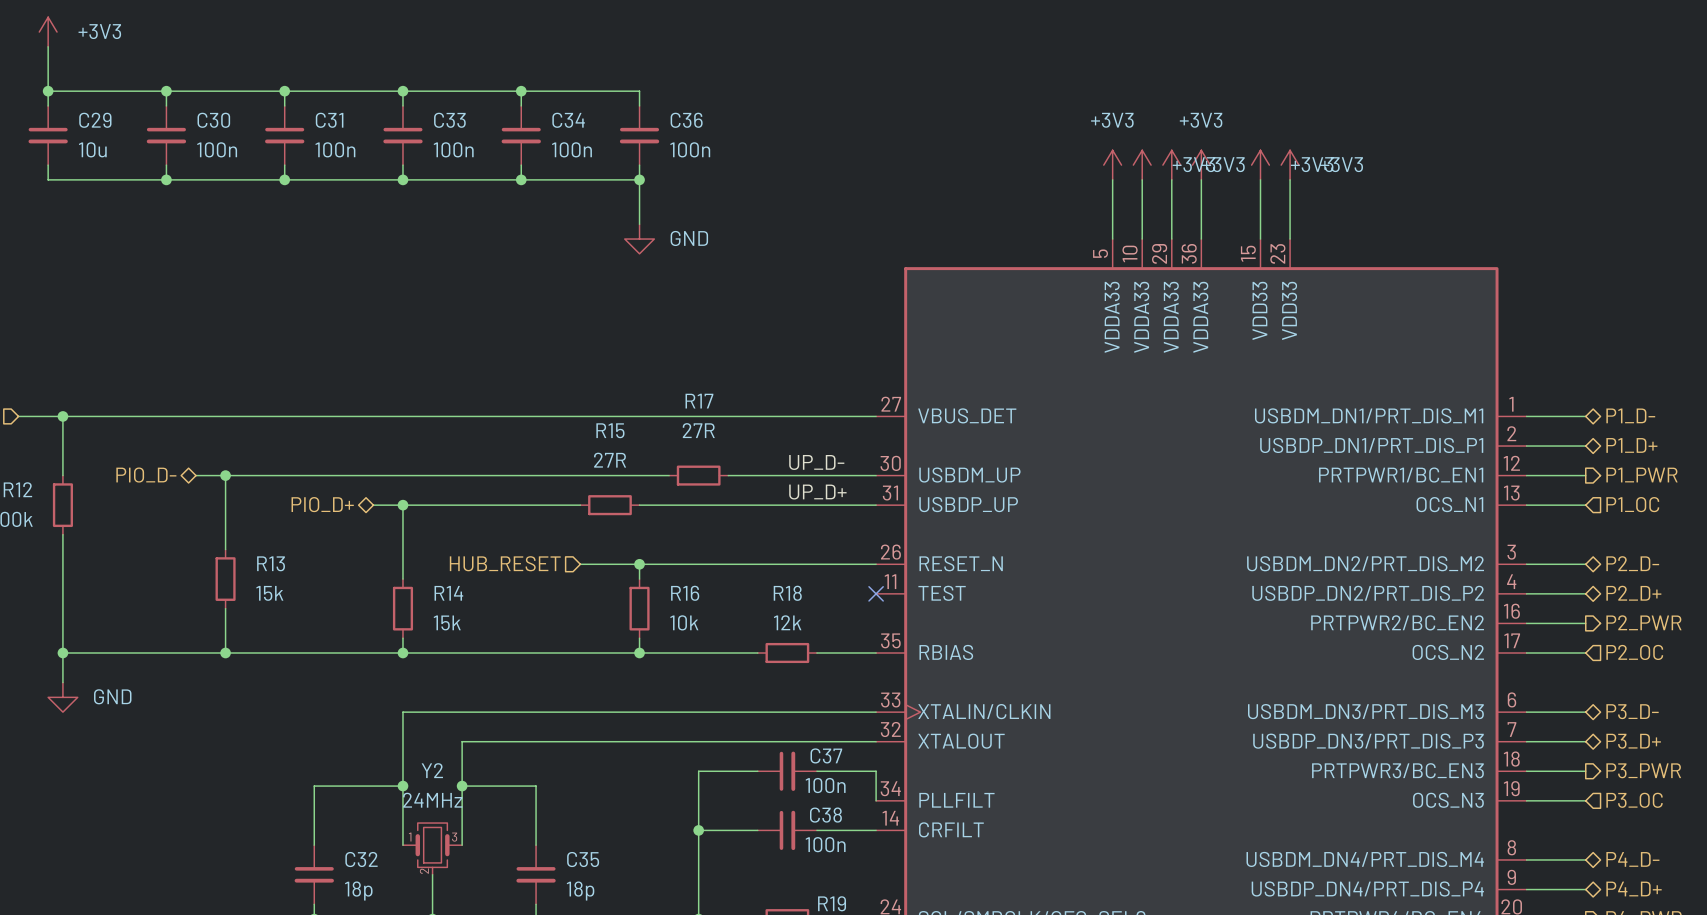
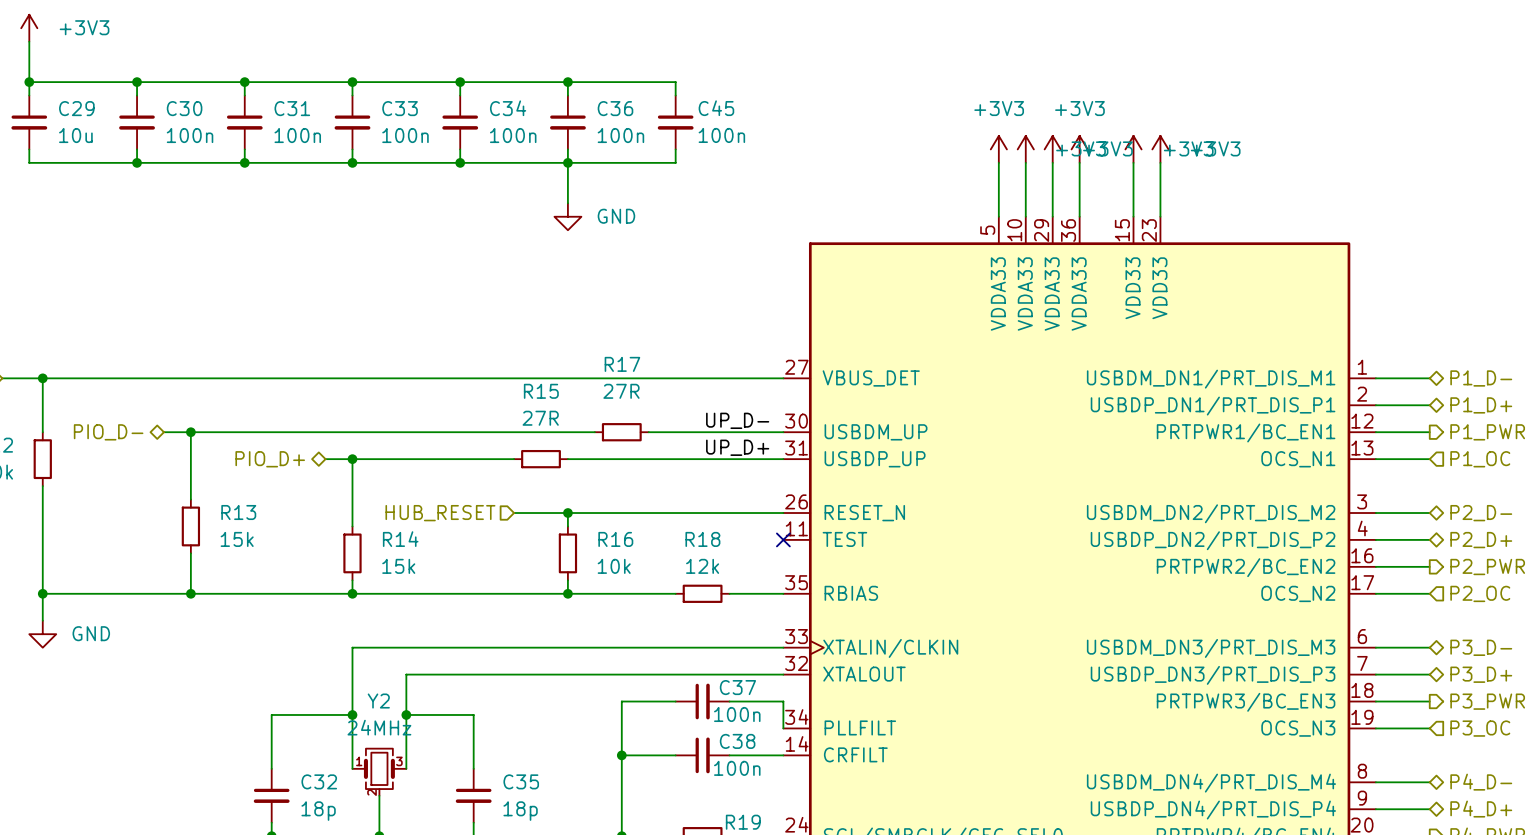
wire: none -> (567, 82) (675, 82) (675, 95)
junction: none -> (567, 82)
C45: none -> 100n (675, 122)
wire: none -> (675, 149) (675, 162) (567, 162)

